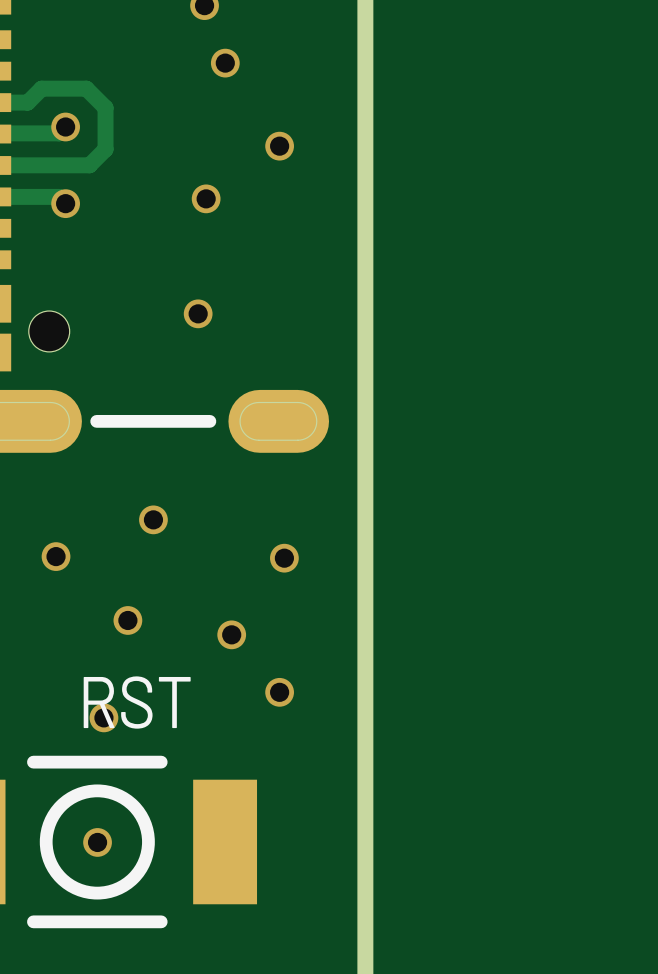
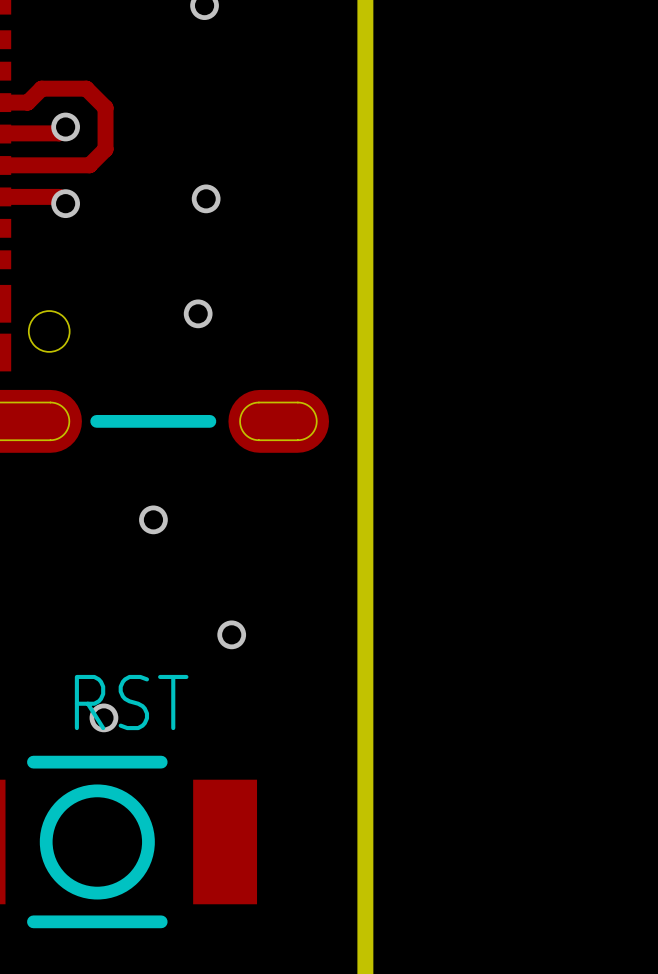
via: (225, 63) -> none
via: (279, 146) -> none
via: (56, 556) -> none
via: (284, 558) -> none
via: (127, 620) -> none
via: (279, 692) -> none
via: (97, 842) -> none

